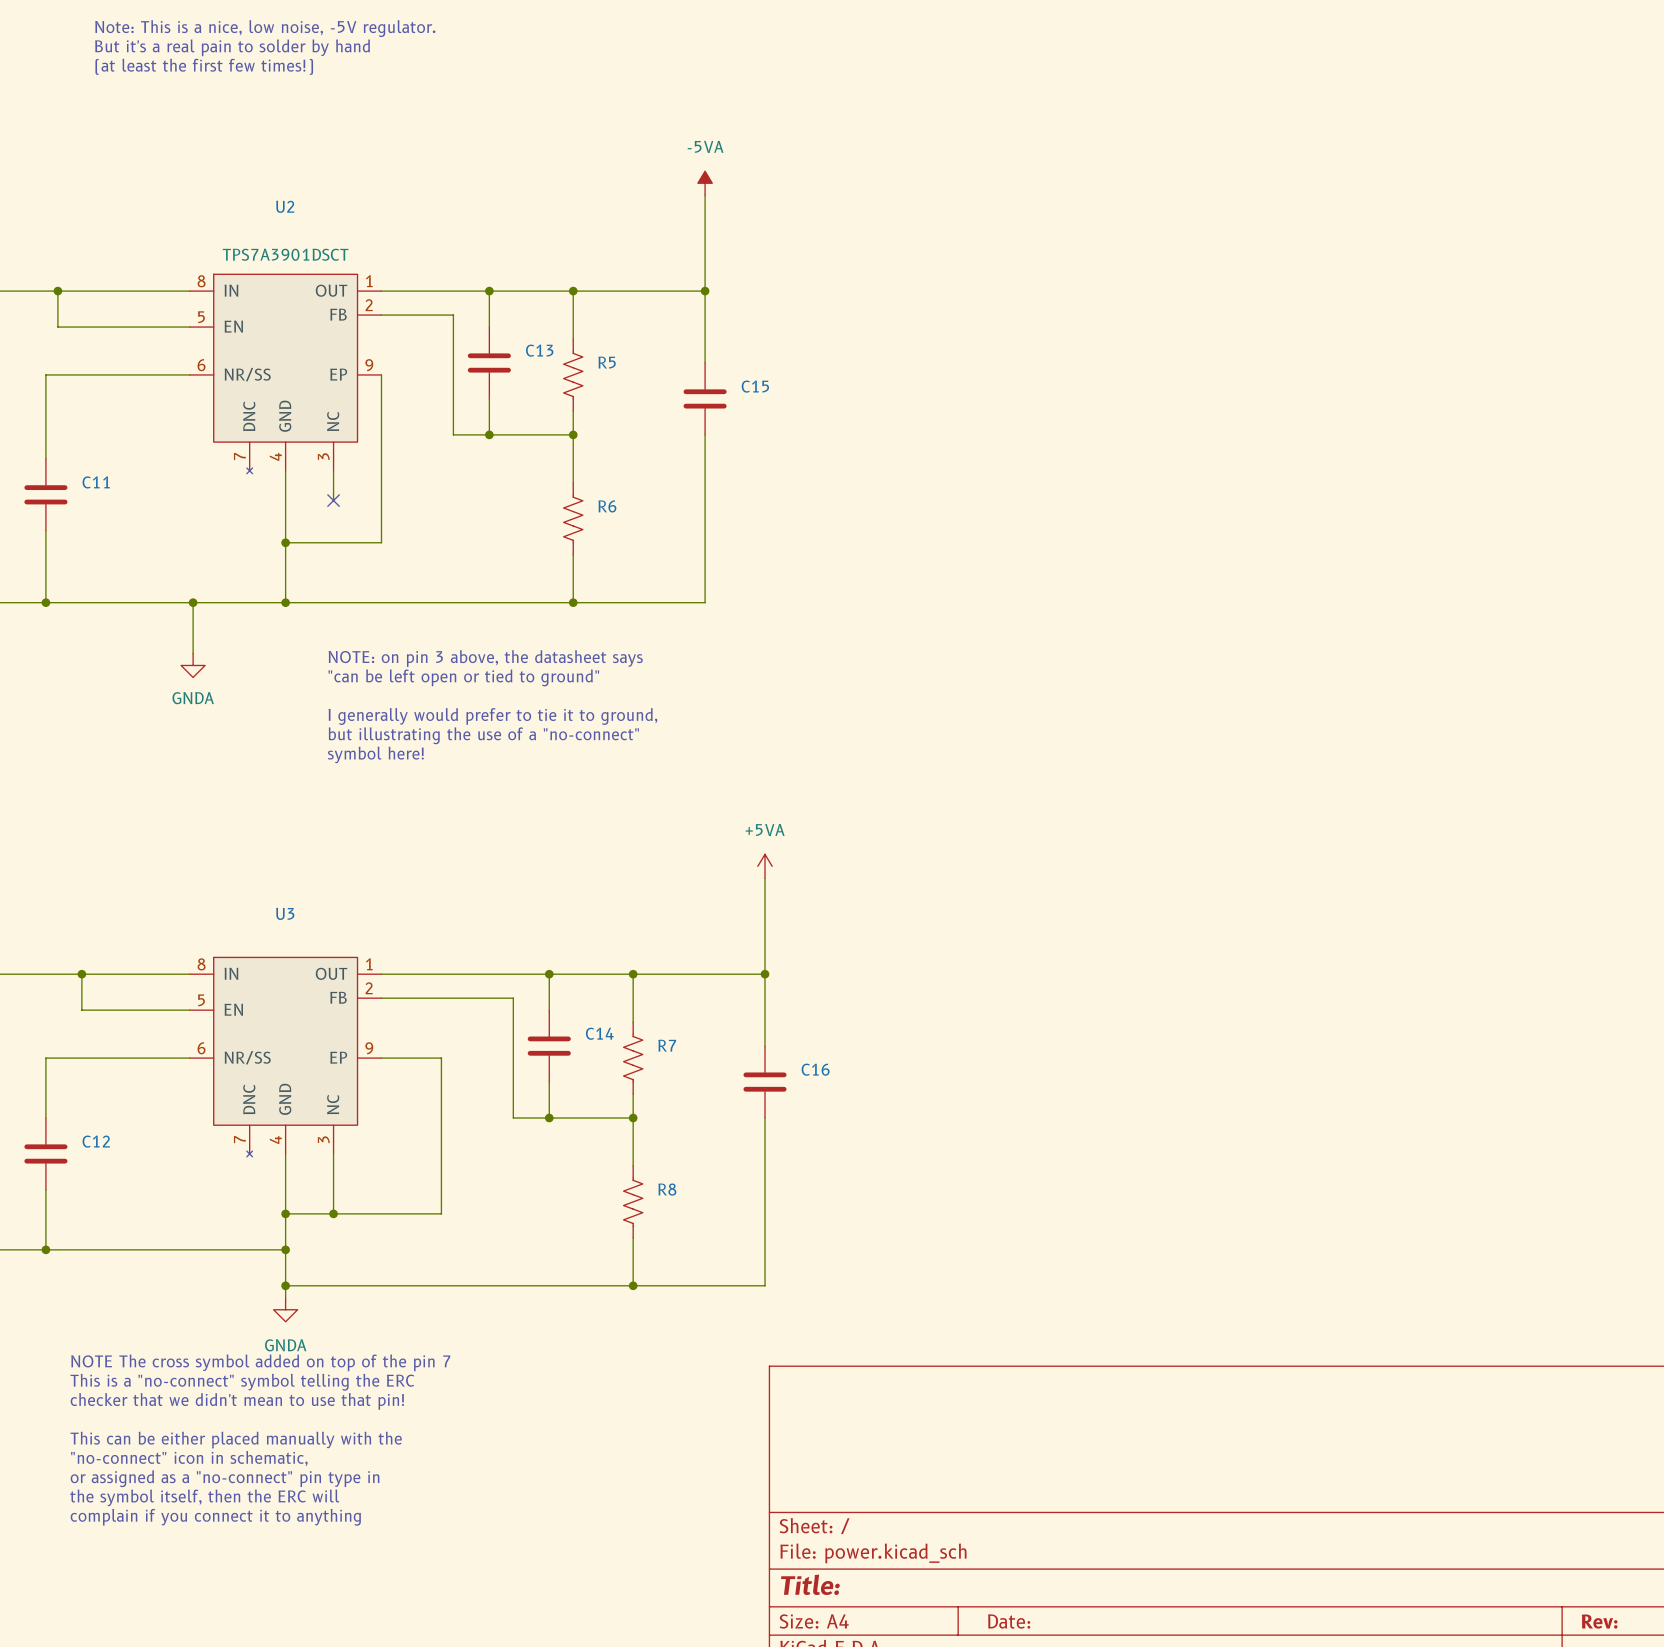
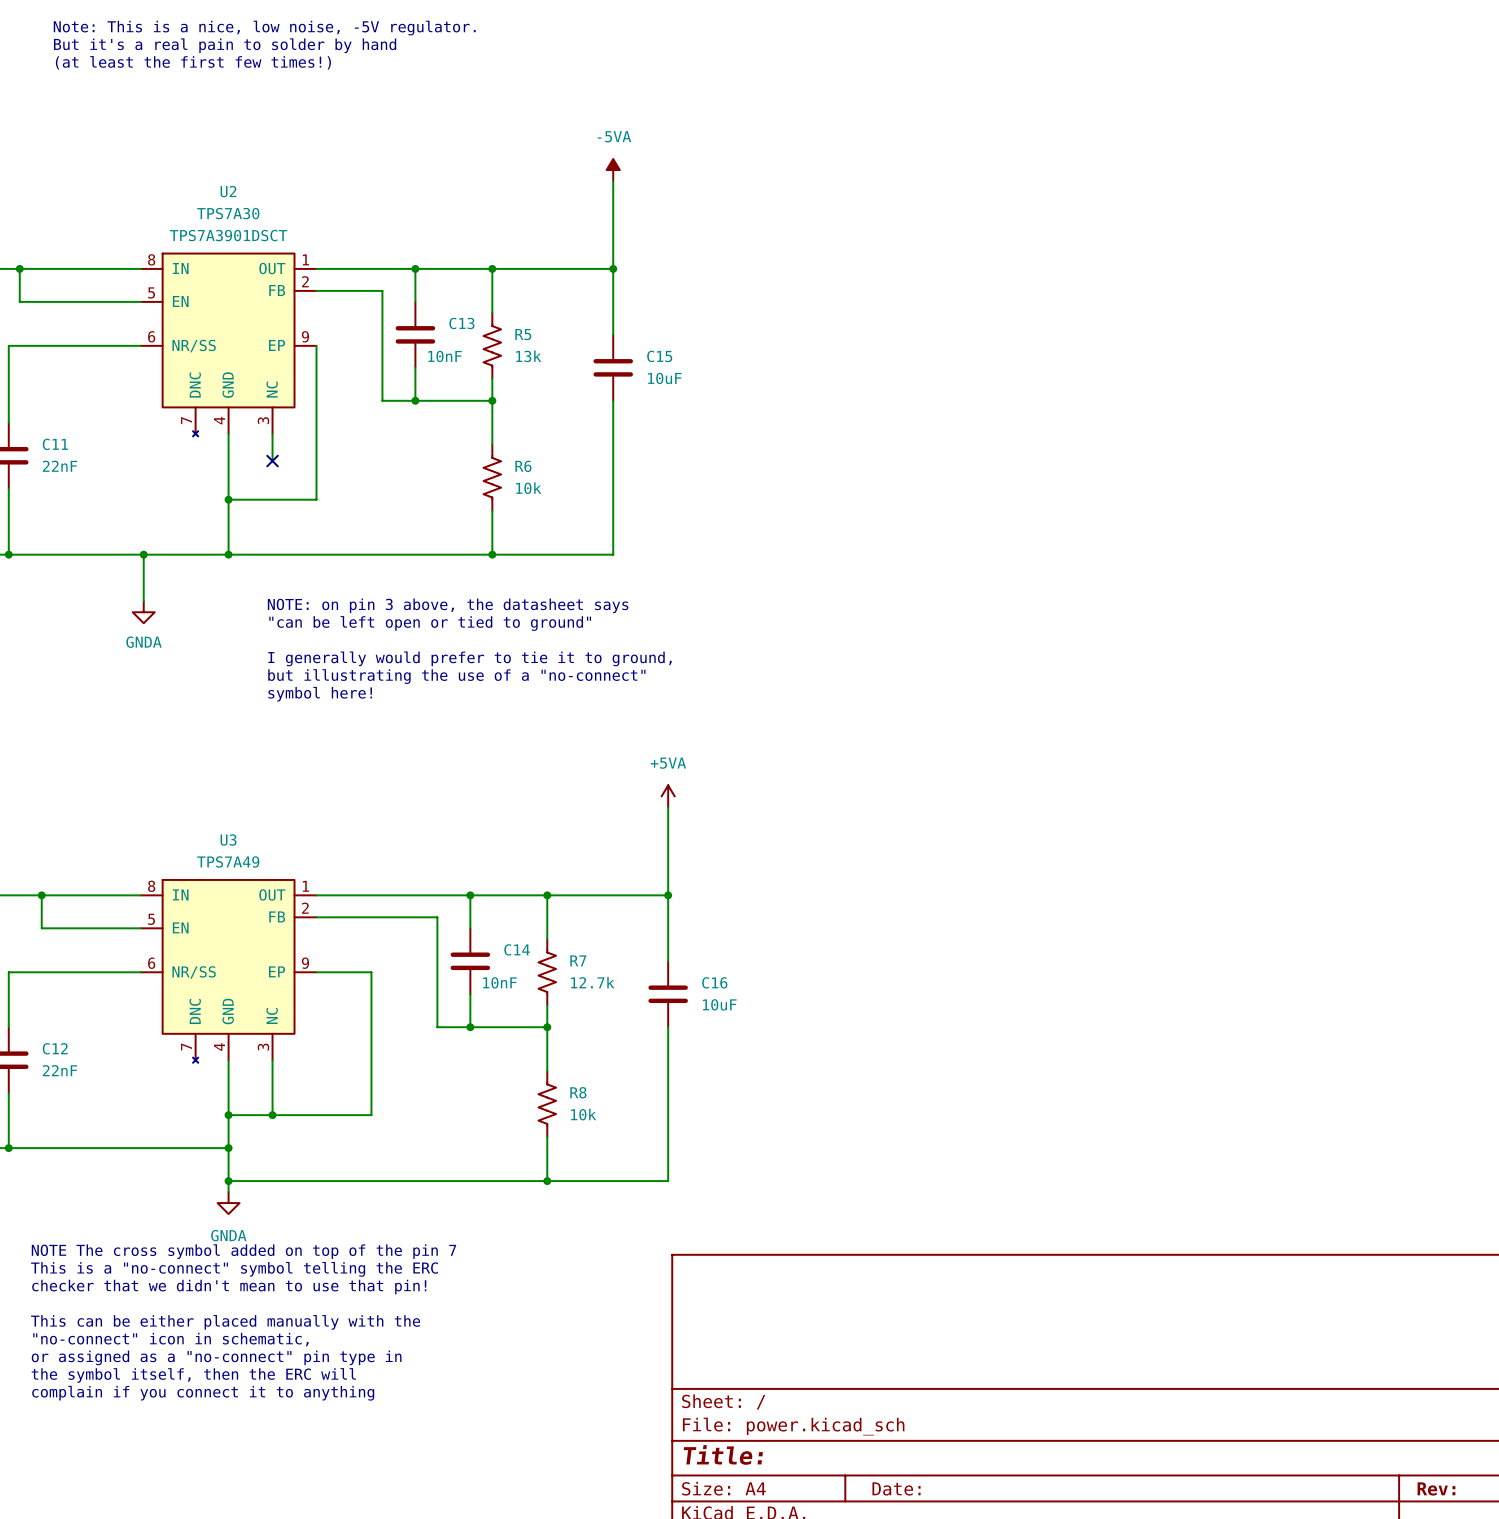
U2 value: none -> TPS7A30 (228, 213)
C13 value: none -> 10nF (445, 356)
R5 value: none -> 13k (528, 356)
C15 value: none -> 10uF (664, 378)
C11 value: none -> 22nF (60, 466)
R6 value: none -> 10k (528, 488)
U3 value: none -> TPS7A49 (228, 861)
C14 value: none -> 10nF (499, 982)
R7 value: none -> 12.7k (592, 982)
C16 value: none -> 10uF (719, 1004)
C12 value: none -> 22nF (60, 1070)
R8 value: none -> 10k (583, 1114)

